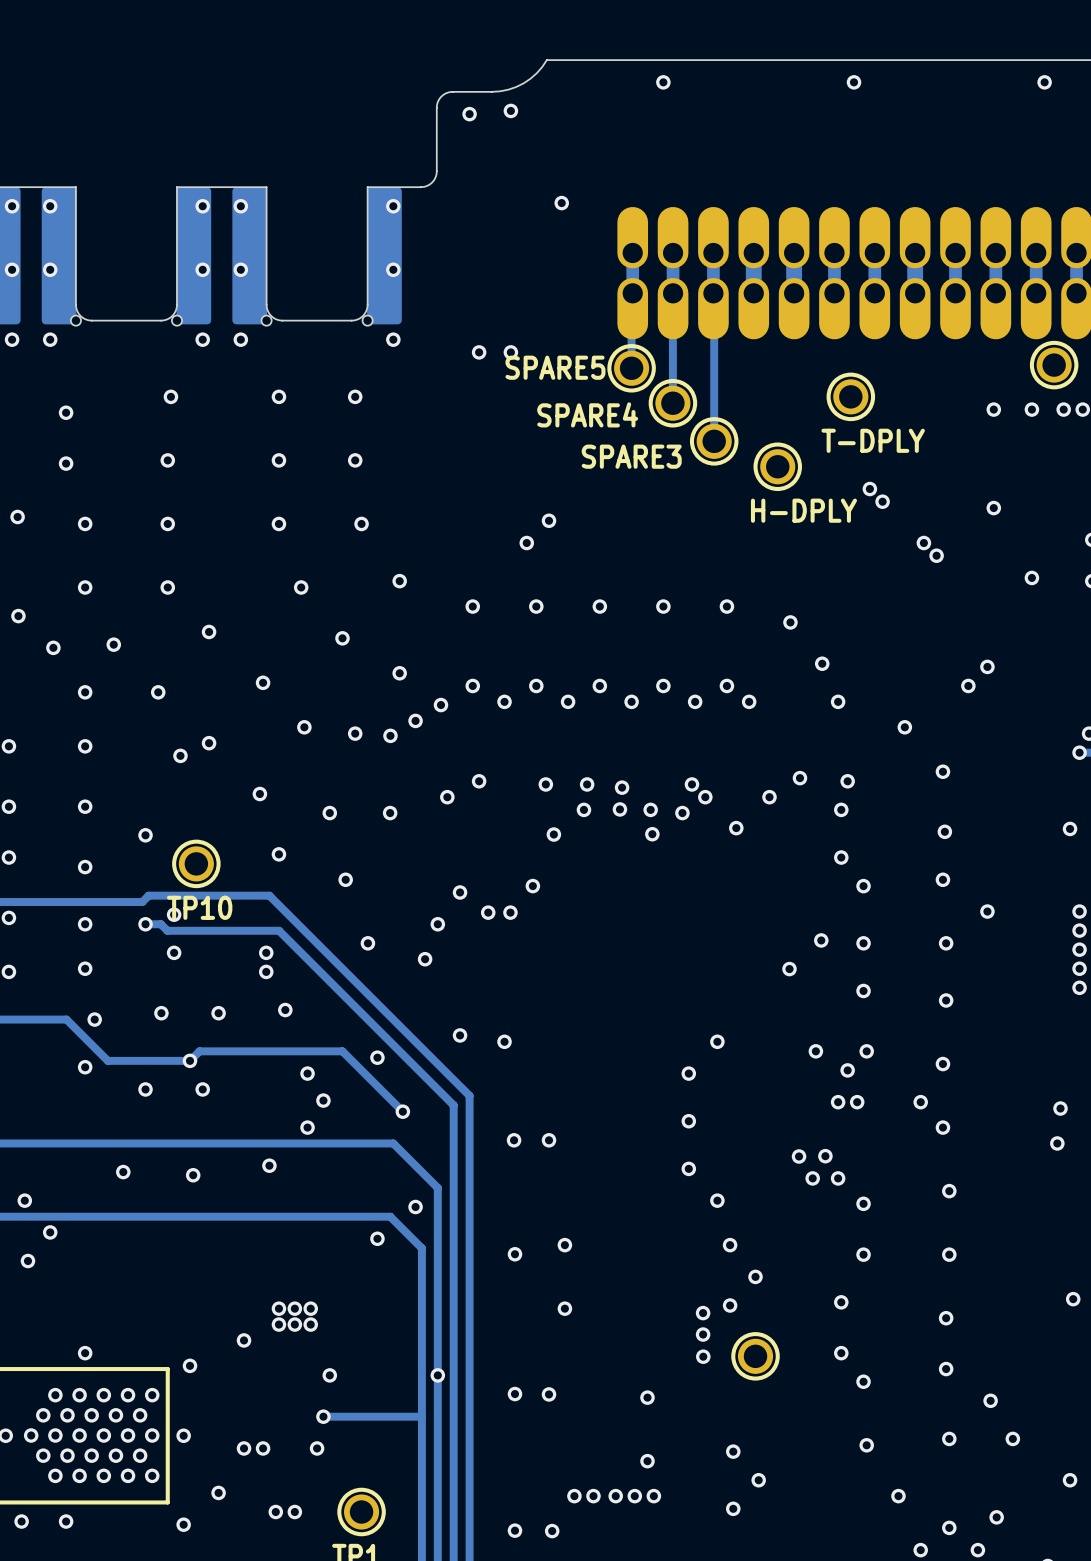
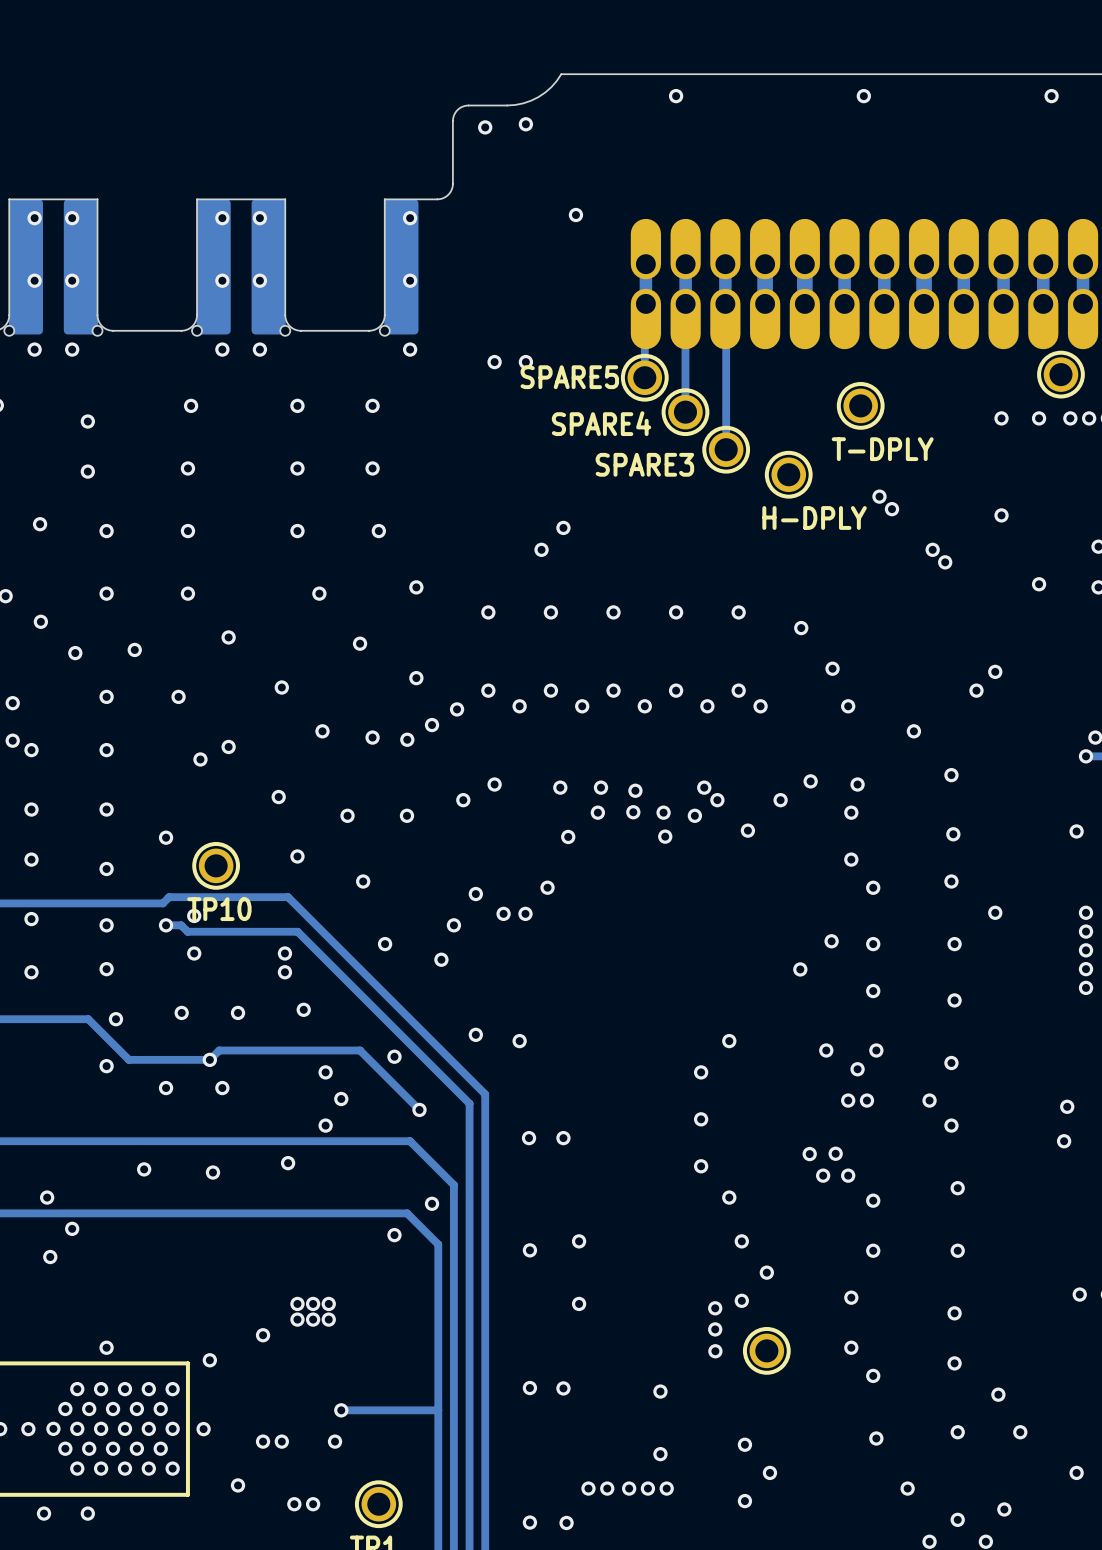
via: (329, 1375) -> none
via: (437, 1375) -> none
via: (183, 1524) -> none

